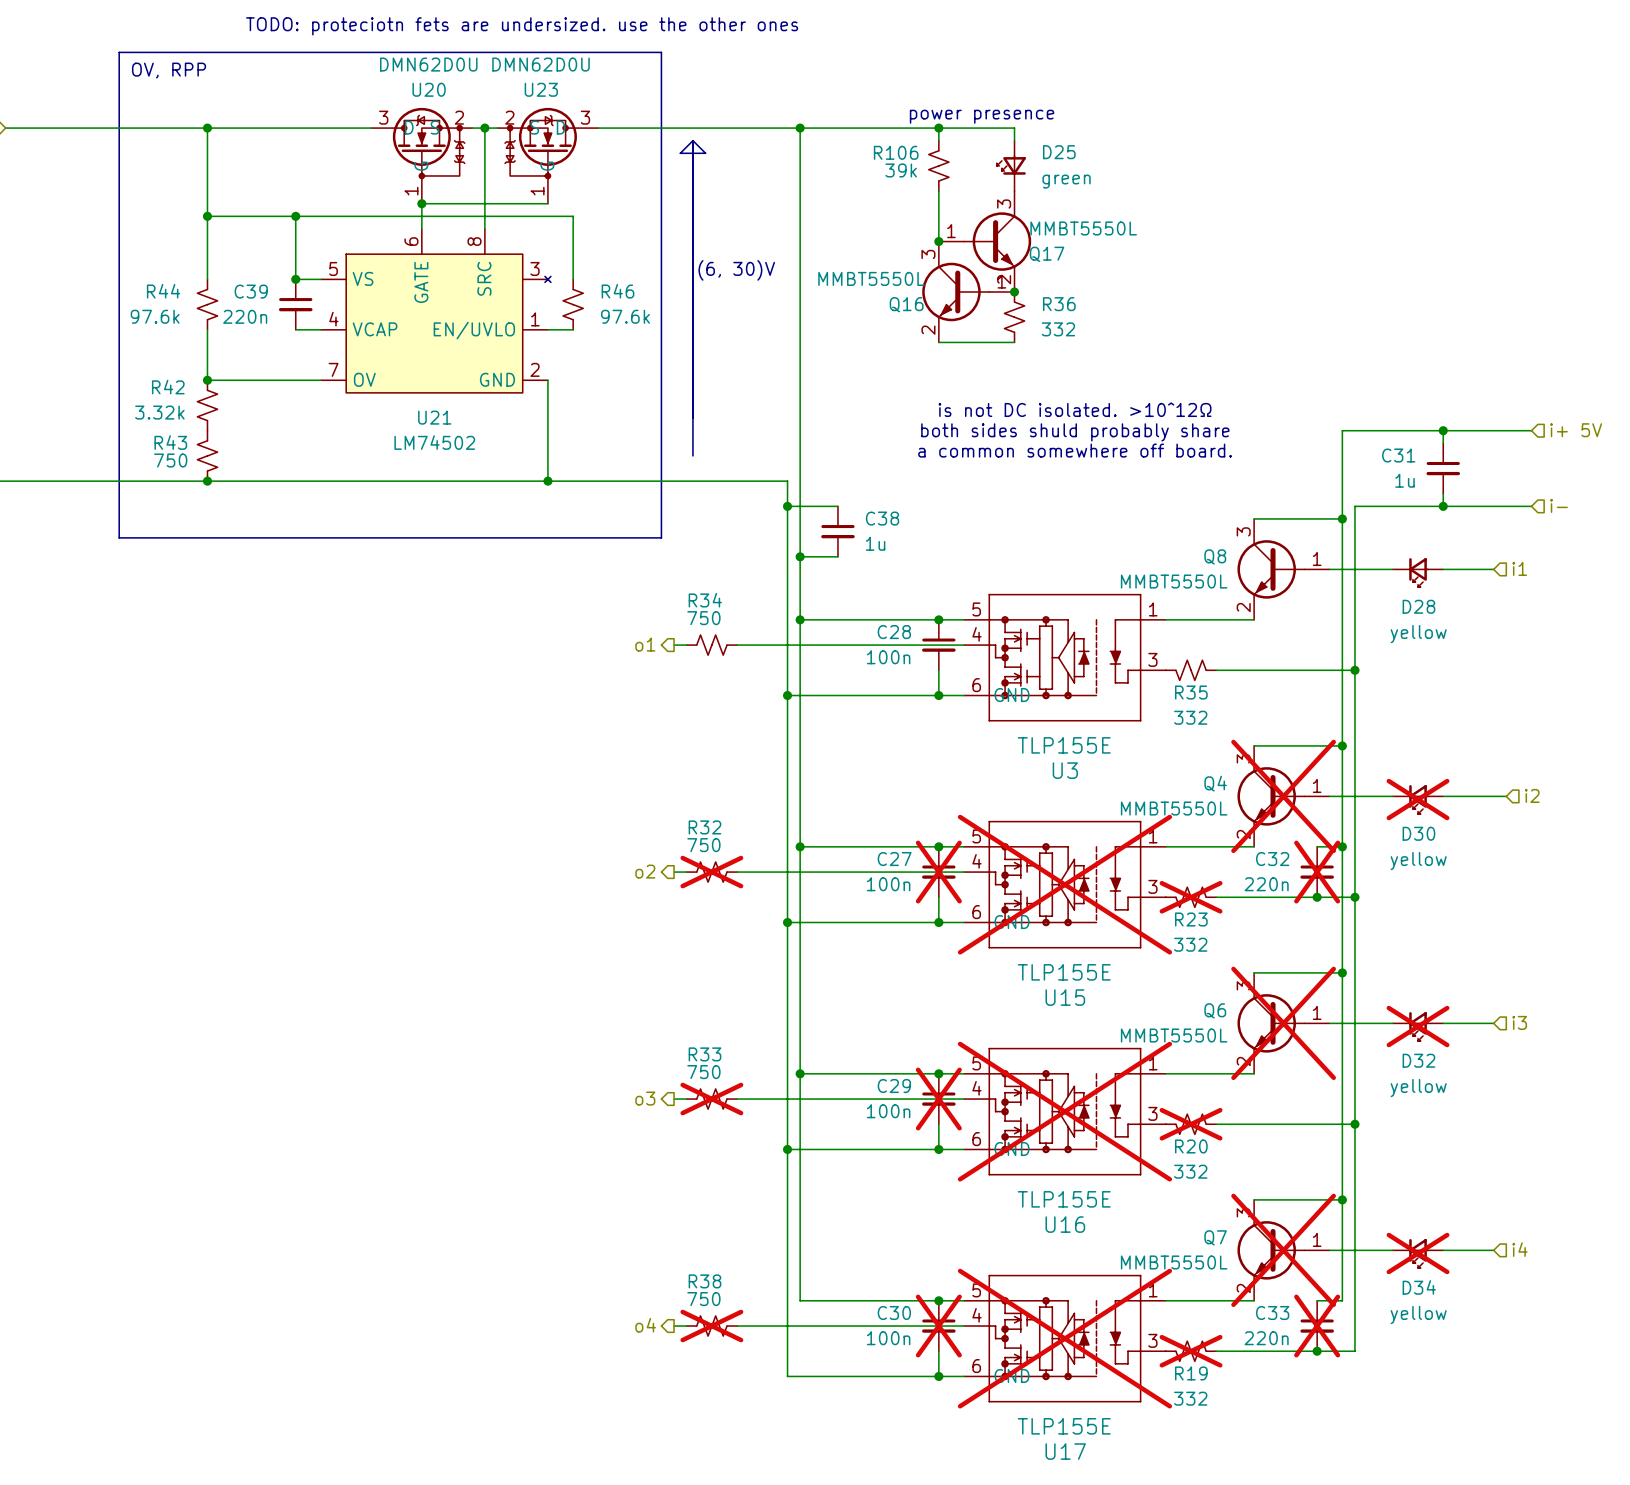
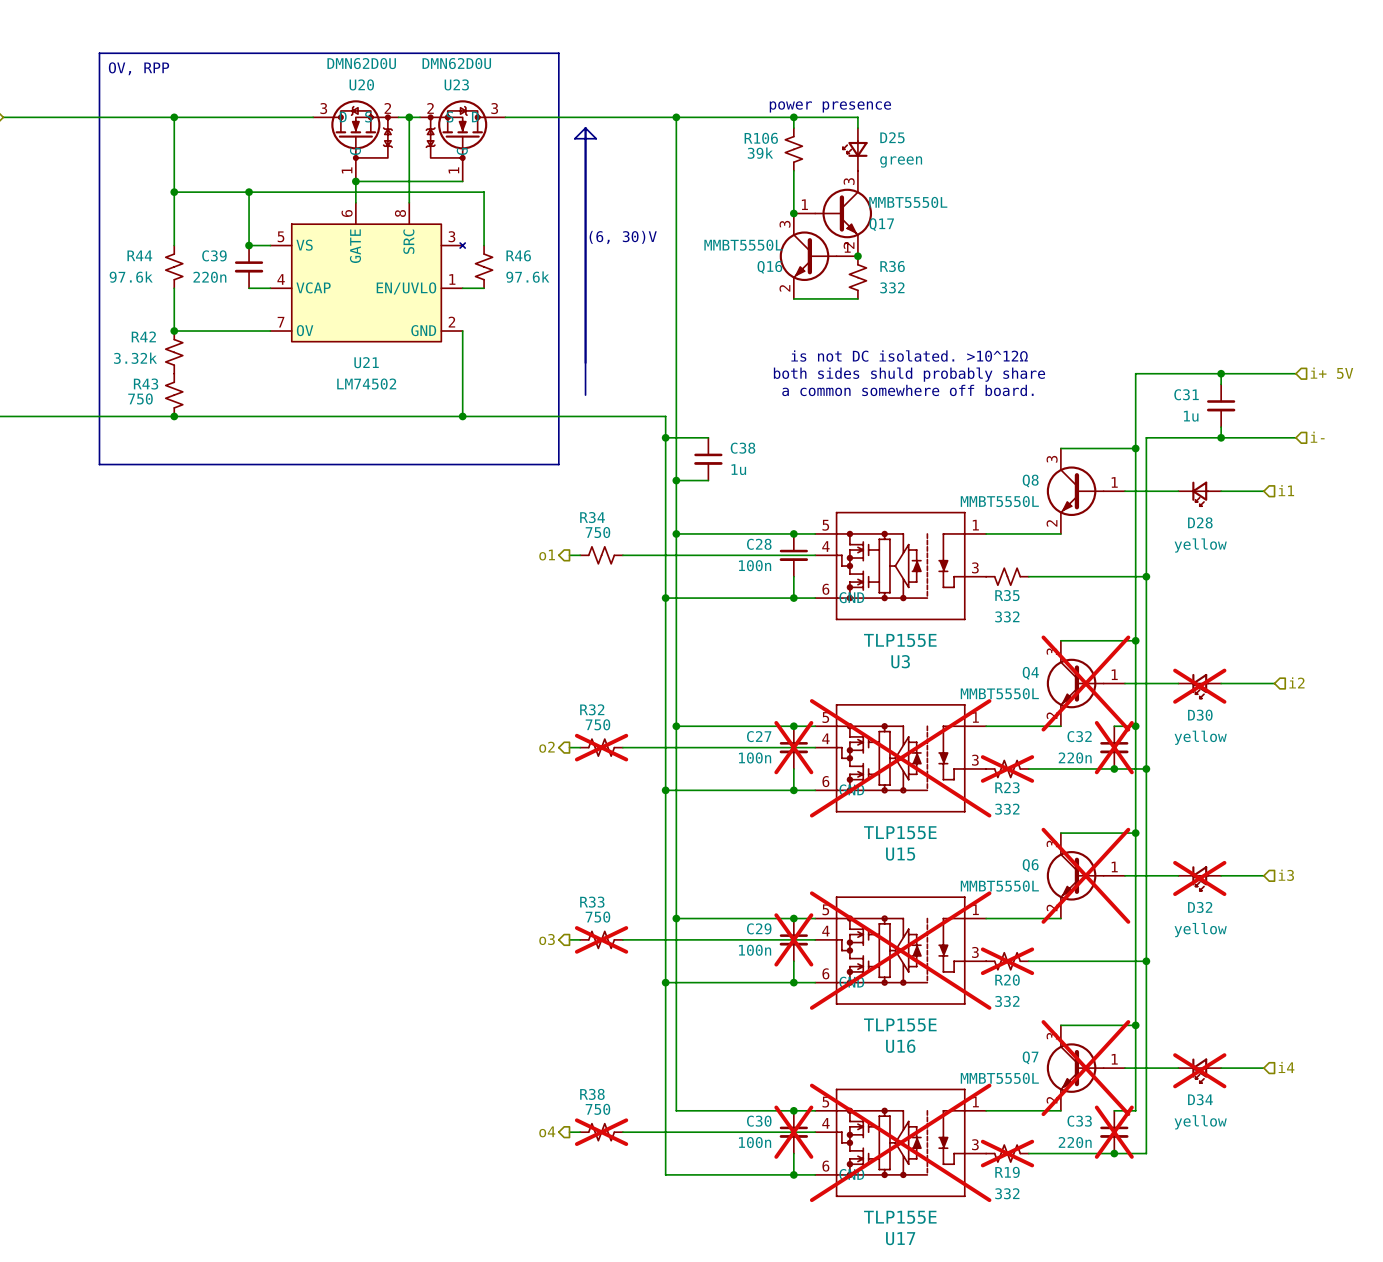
text: TODO: proteciotn fets are undersized. use the other ones (522, 26) -> none

